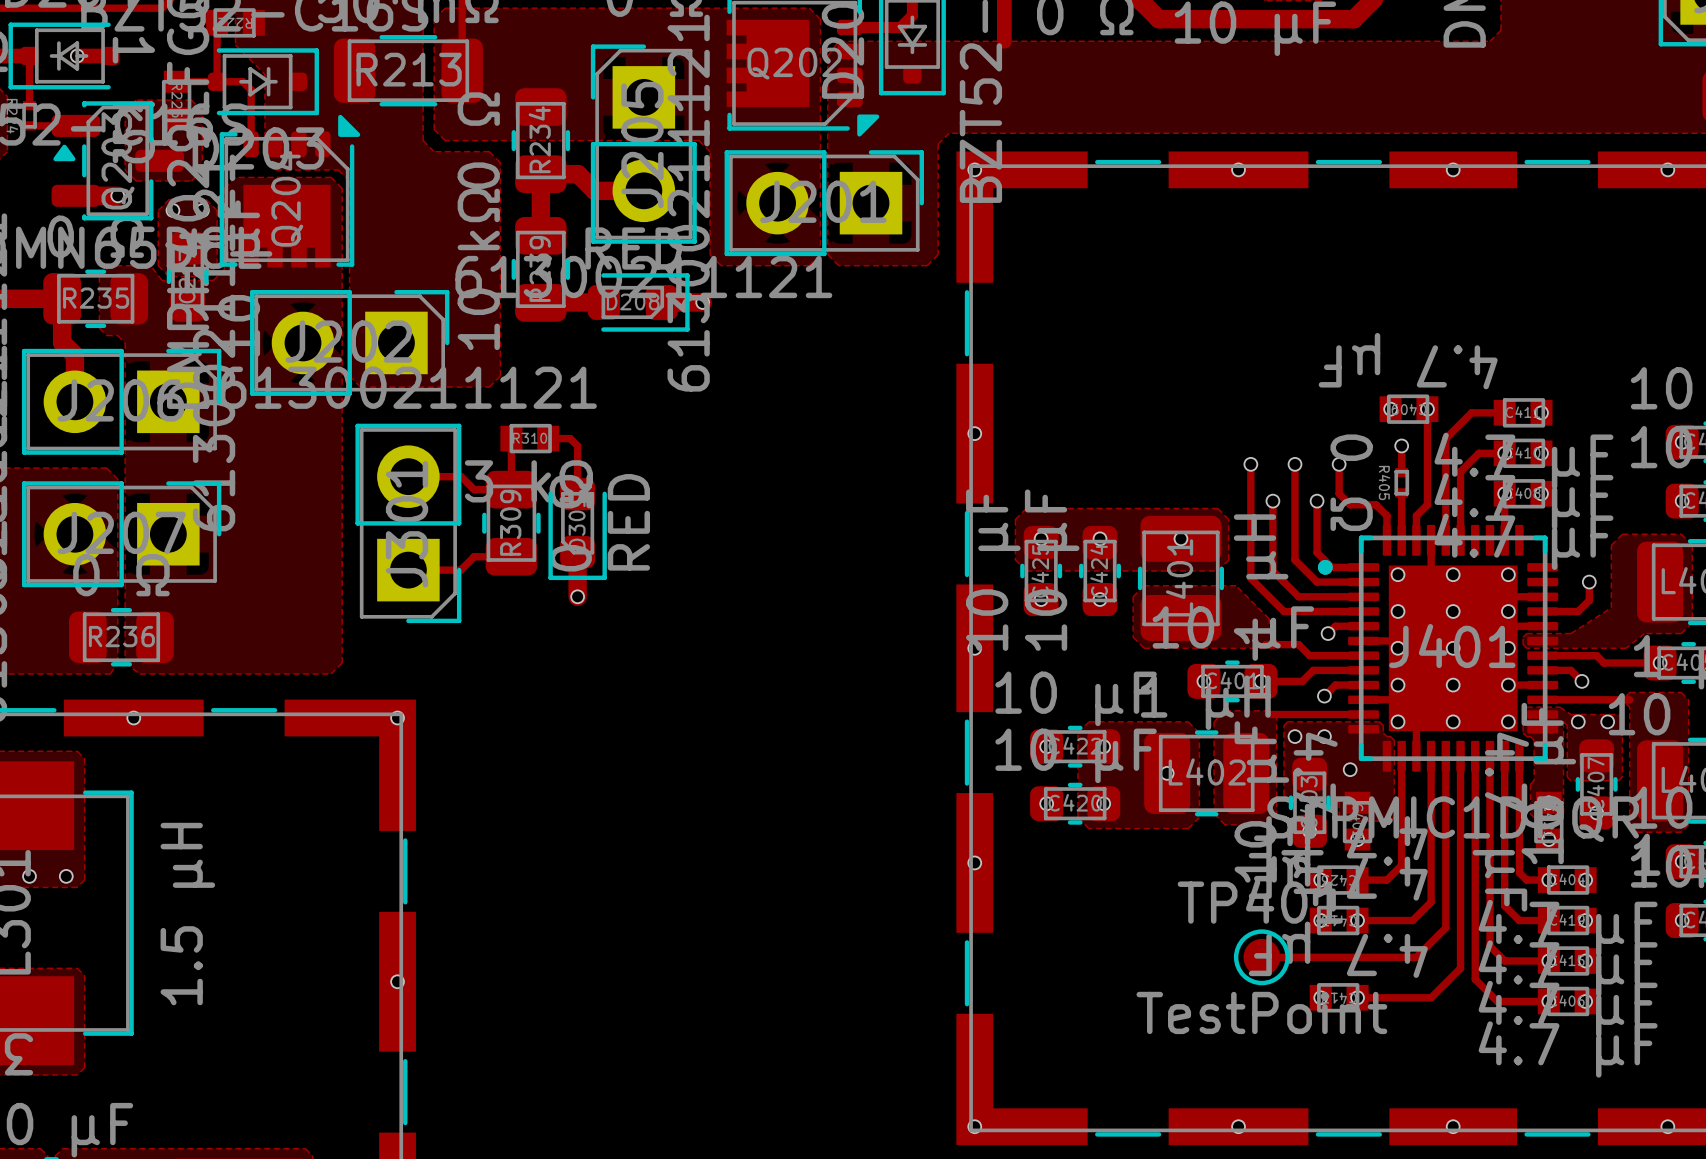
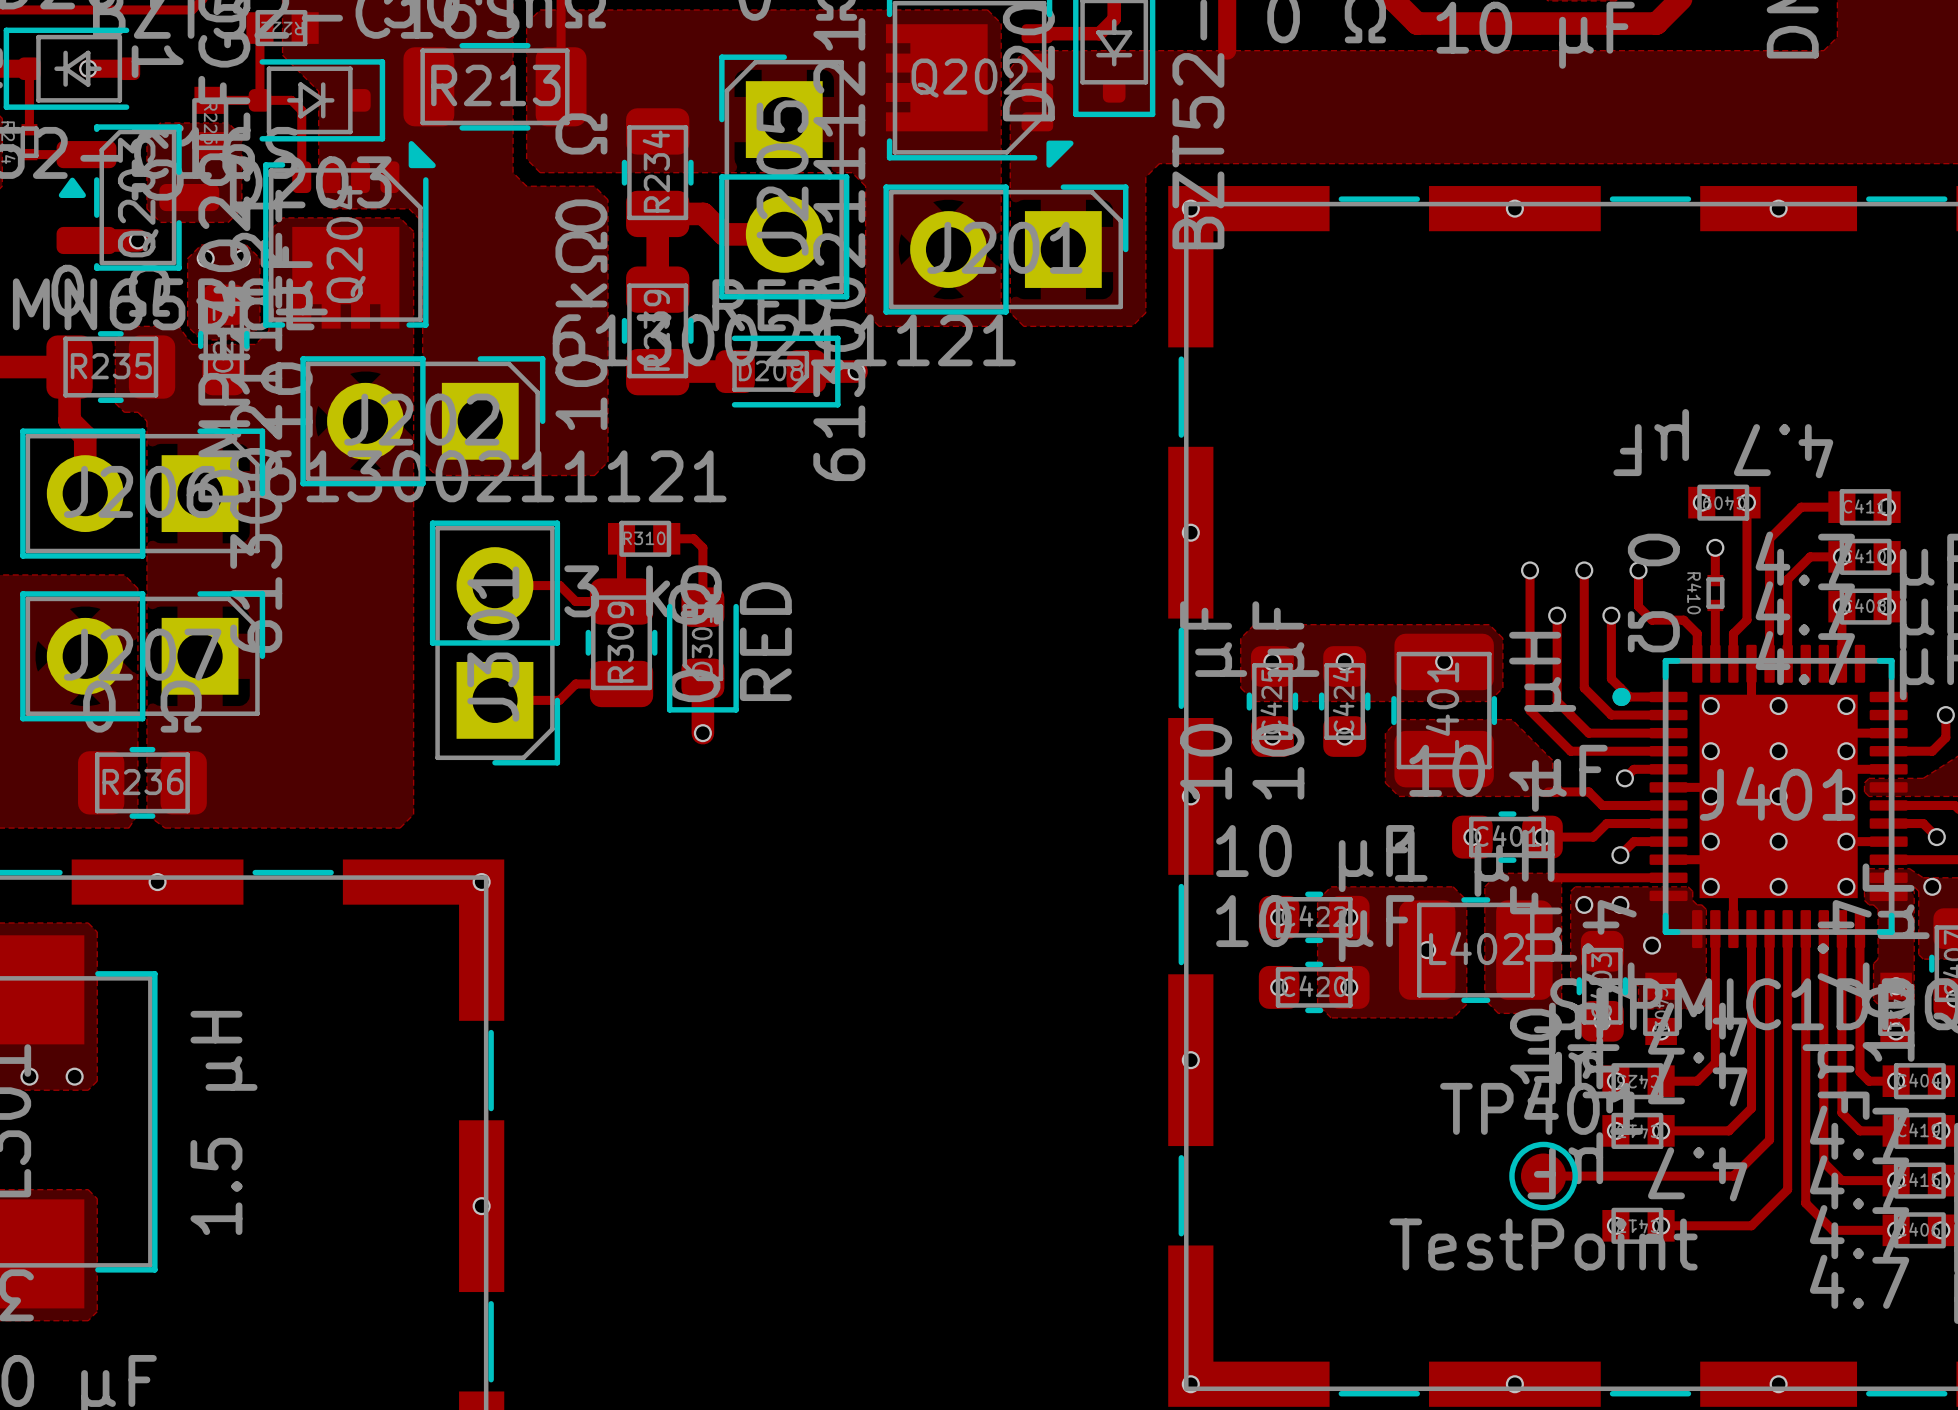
R405 name: R405 (1384, 482) -> R410 (1694, 593)

